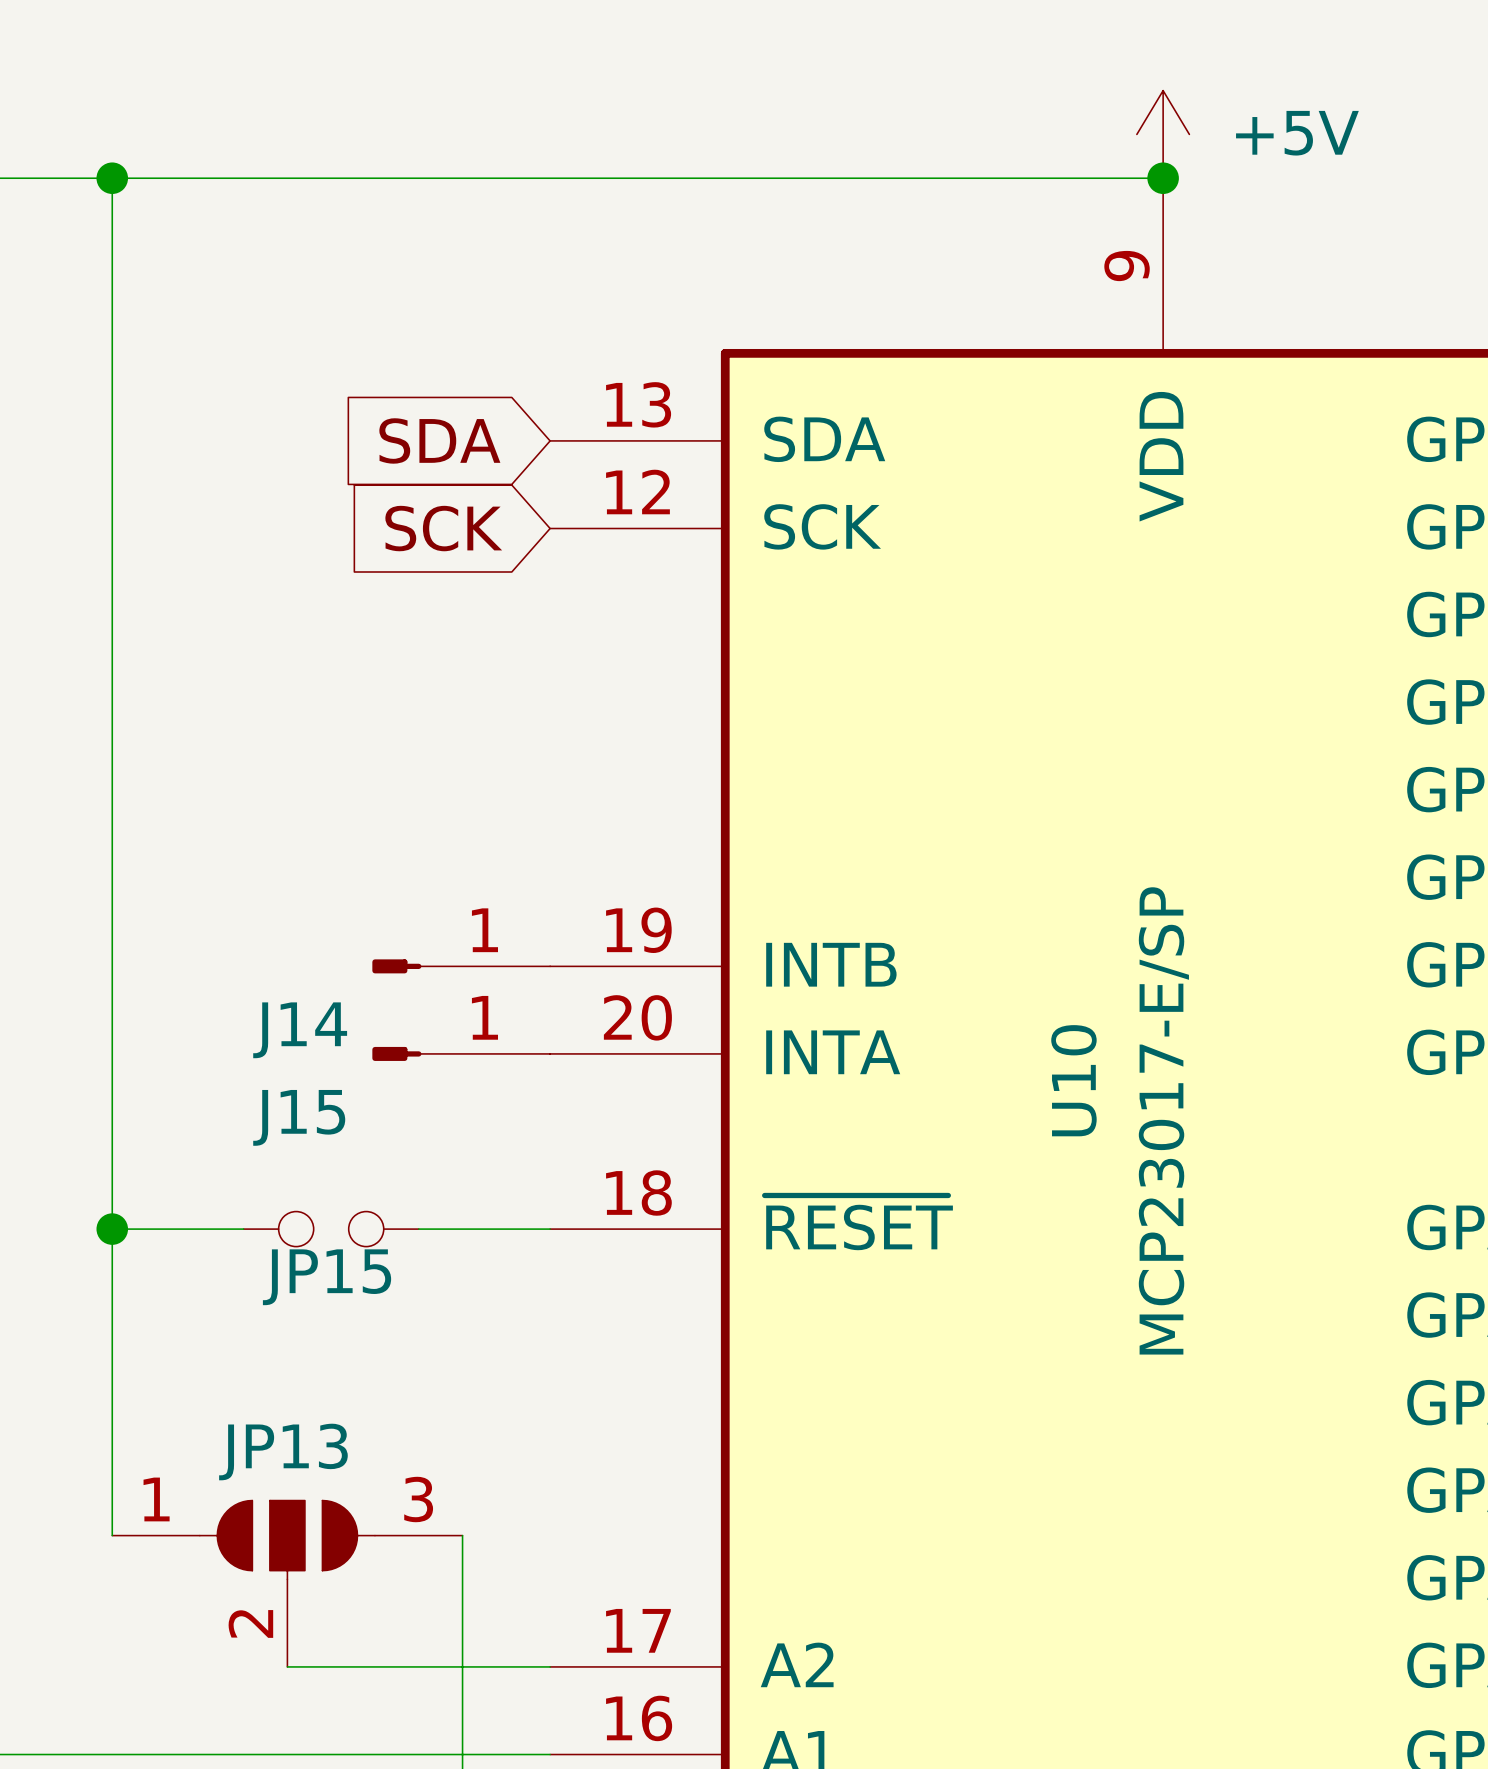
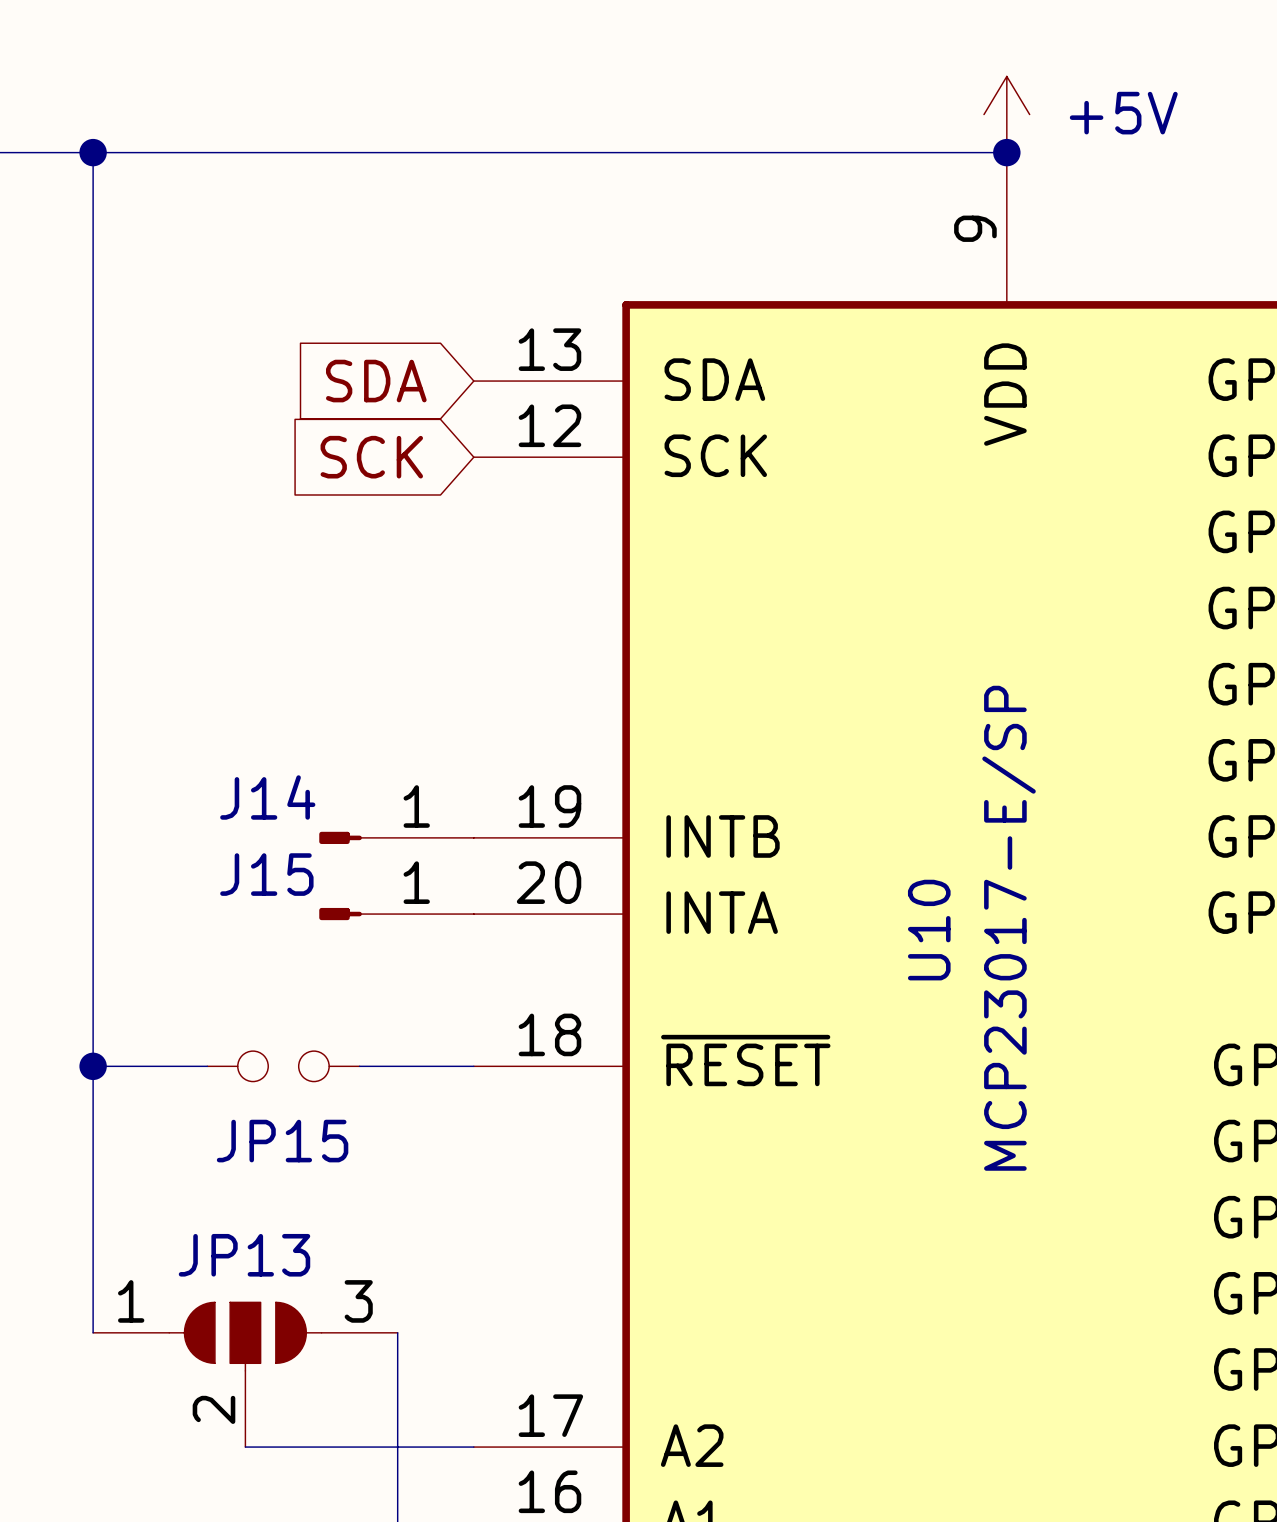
J14 name position: J14 (300, 1030) -> J14 (267, 797)
J15 name position: J15 (299, 1117) -> J15 (266, 874)
JP15 name position: JP15 (327, 1277) -> JP15 (282, 1141)

